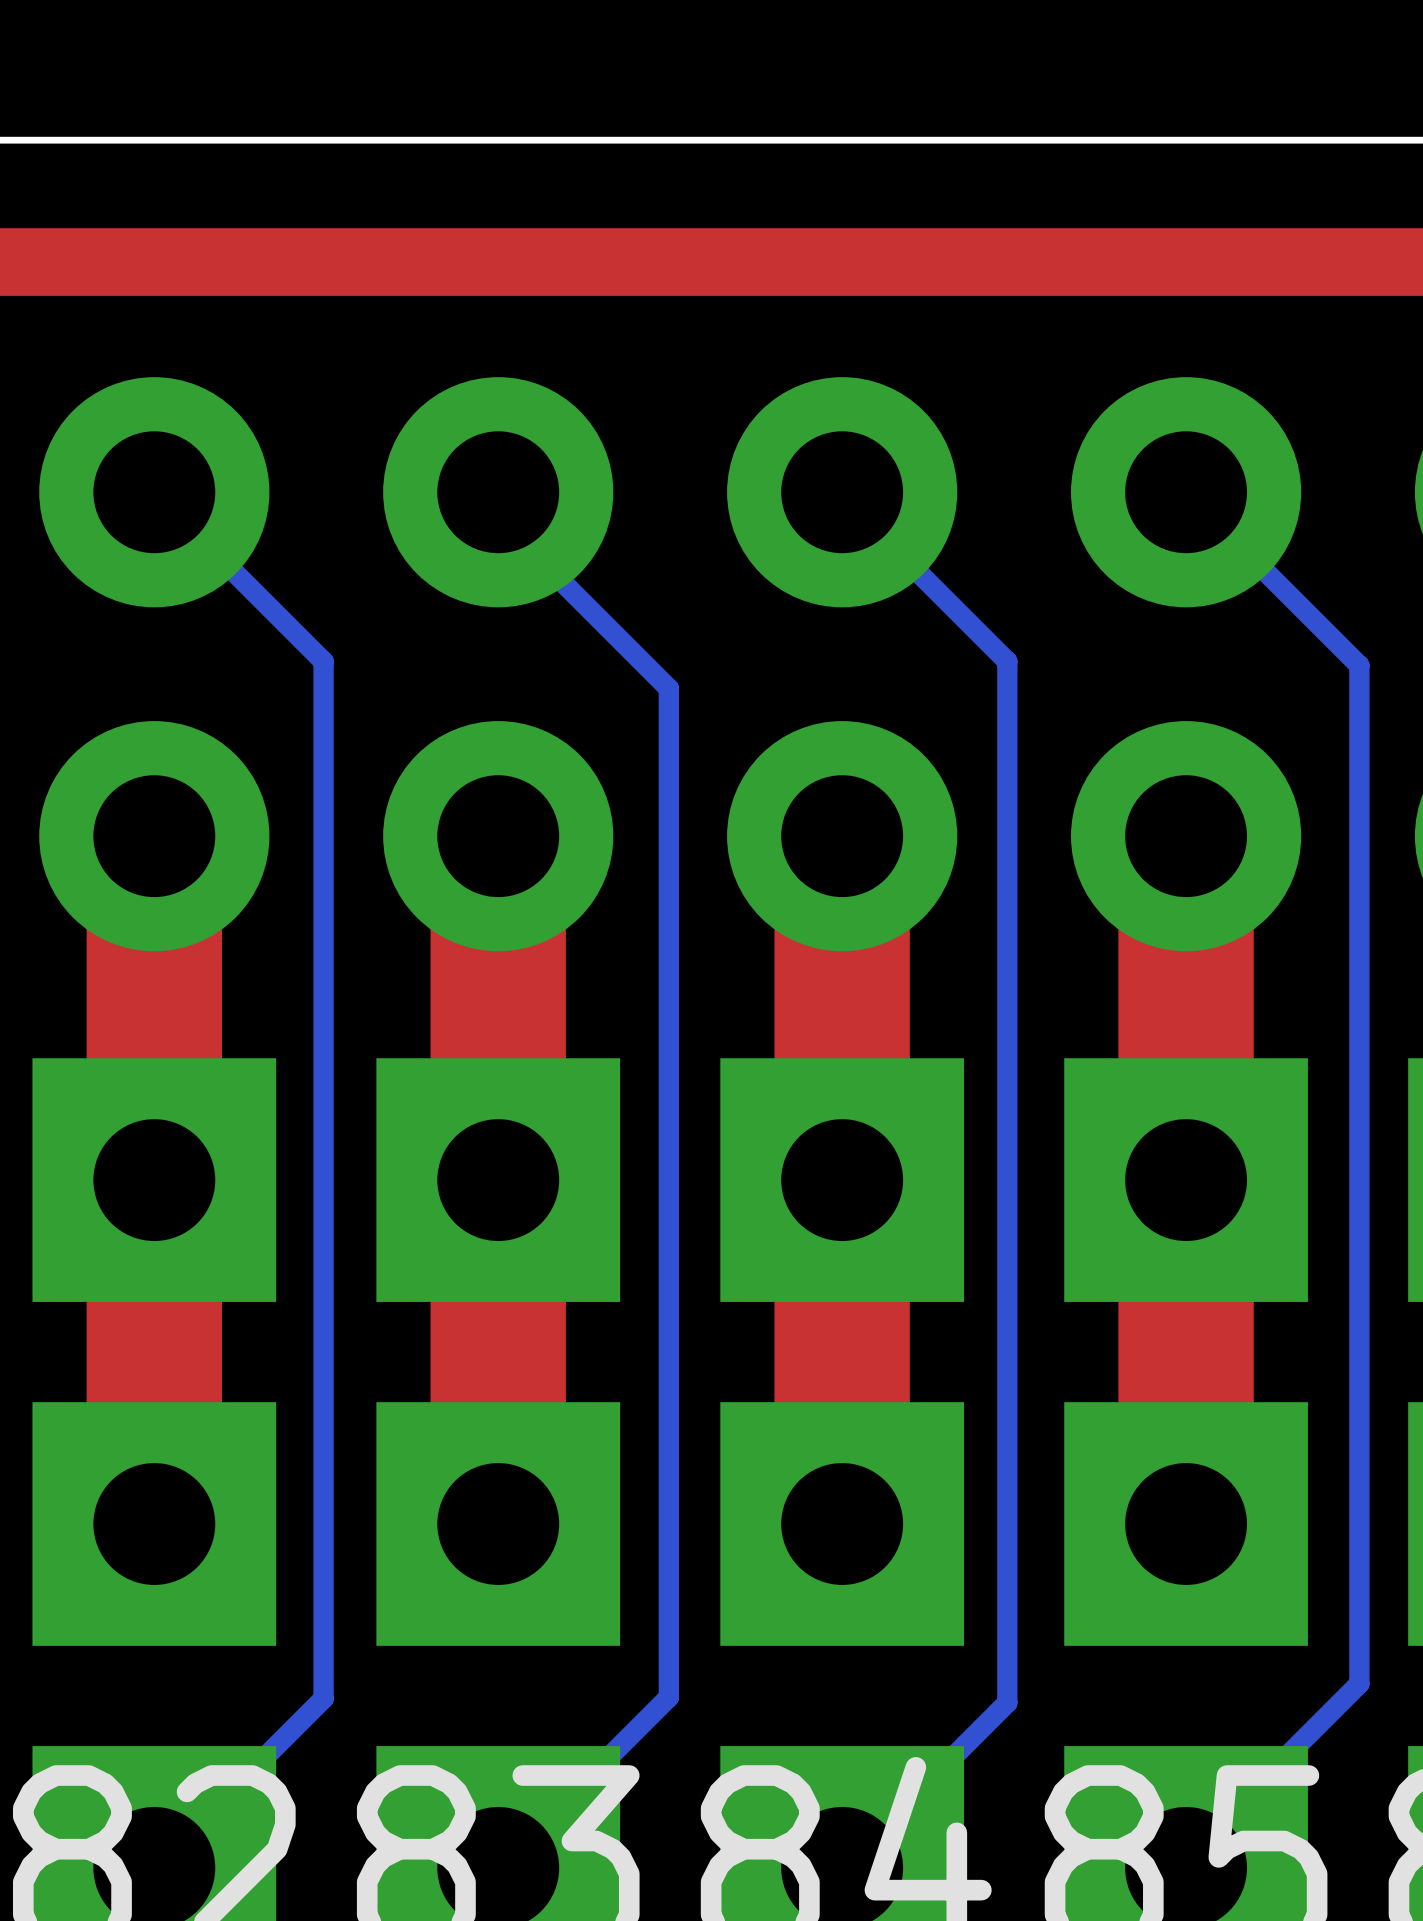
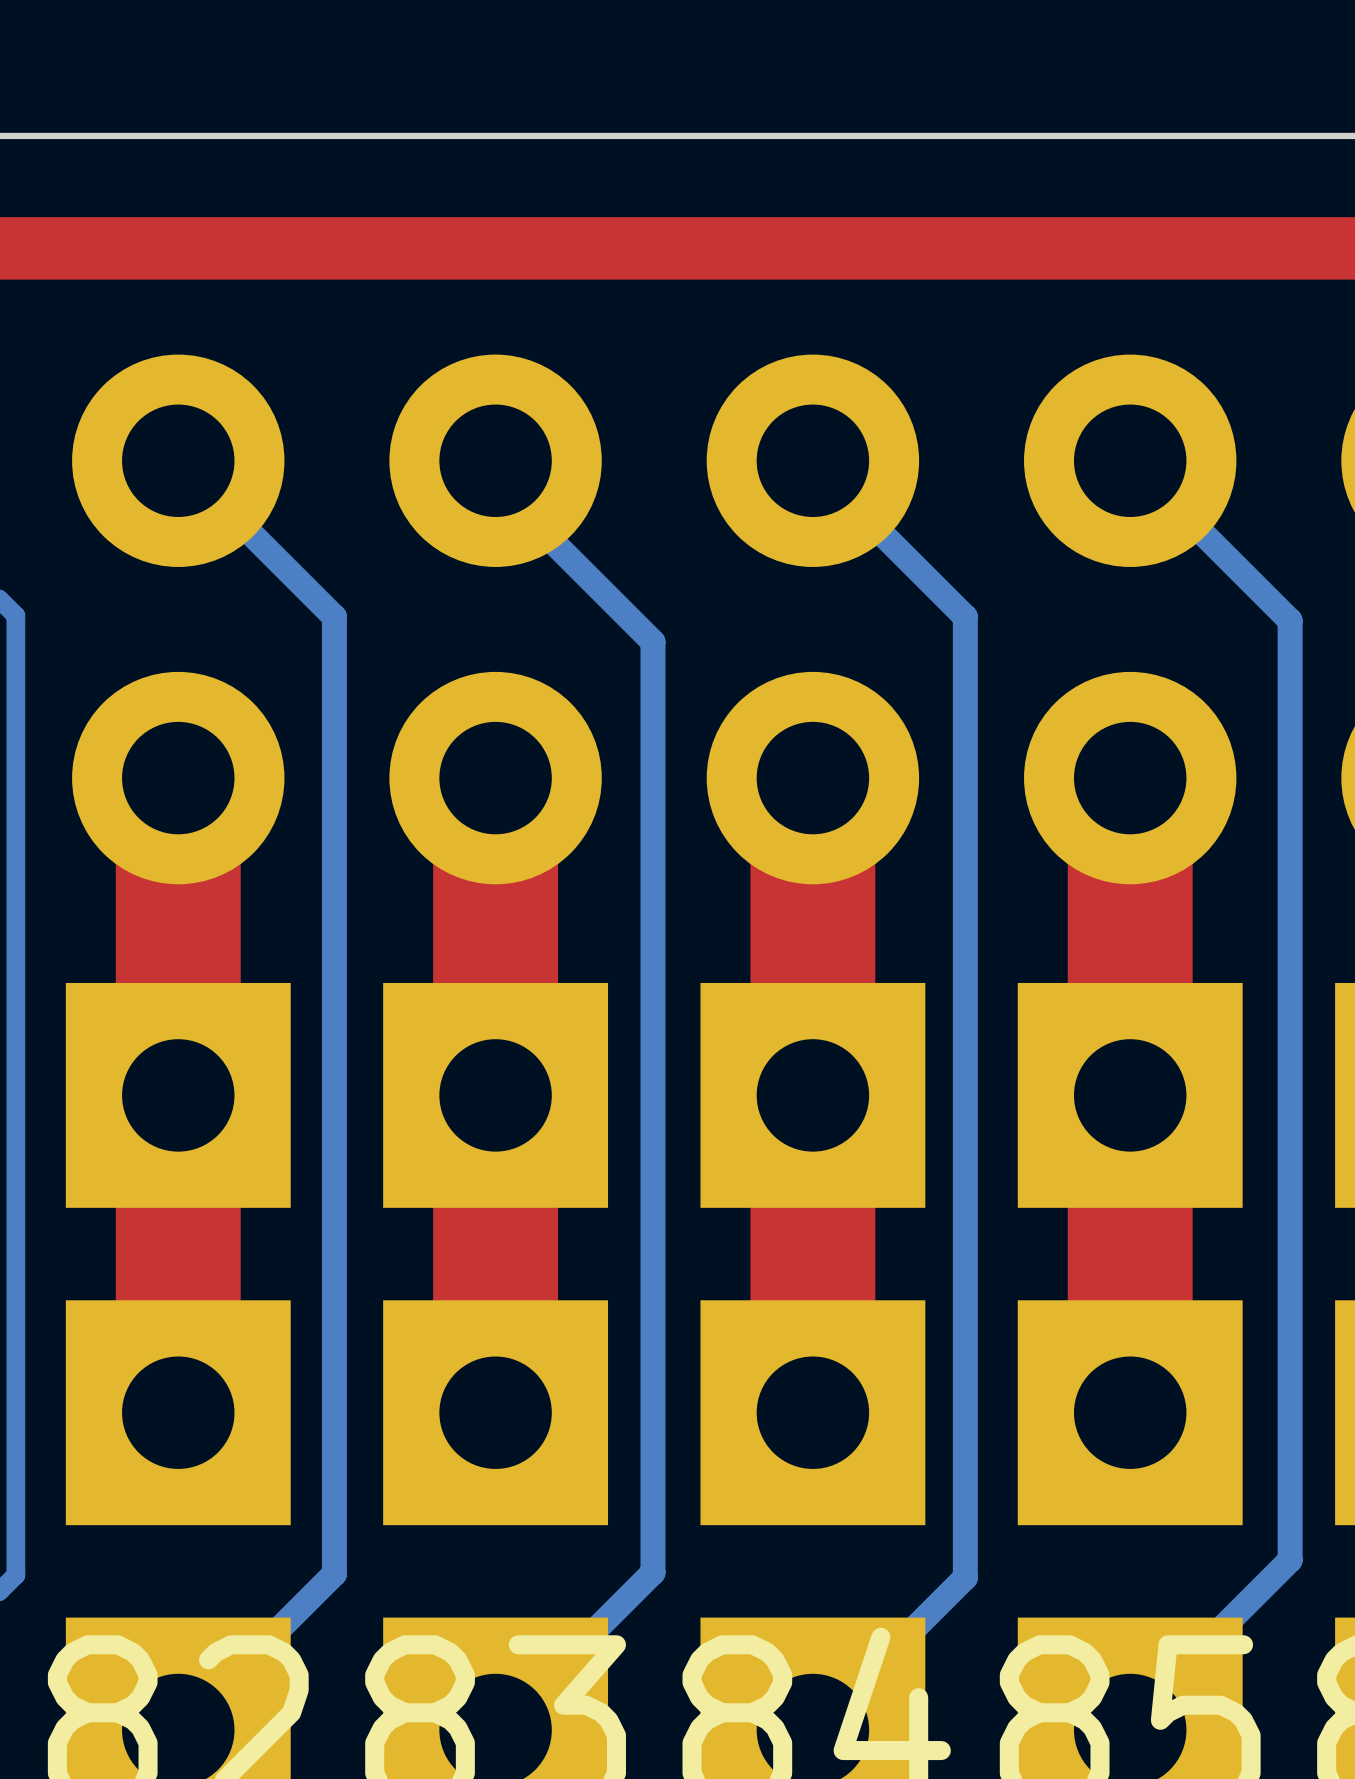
bottom track width: thin (154, 492) (323, 661) (323, 1698) (154, 1867) -> thick (178, 460) (334, 616) (334, 1573) (178, 1730)
bottom track width: thin (1186, 492) (1359, 665) (1359, 1683) (1186, 1857) -> thick (1130, 460) (1290, 620) (1290, 1560) (1130, 1720)
bottom track width: thin (842, 496) (1007, 661) (1007, 1702) (842, 1867) -> thick (812, 464) (965, 616) (965, 1577) (812, 1730)
bottom track width: thin (498, 517) (668, 688) (668, 1697) (498, 1867) -> thick (495, 484) (652, 641) (652, 1572) (495, 1730)

